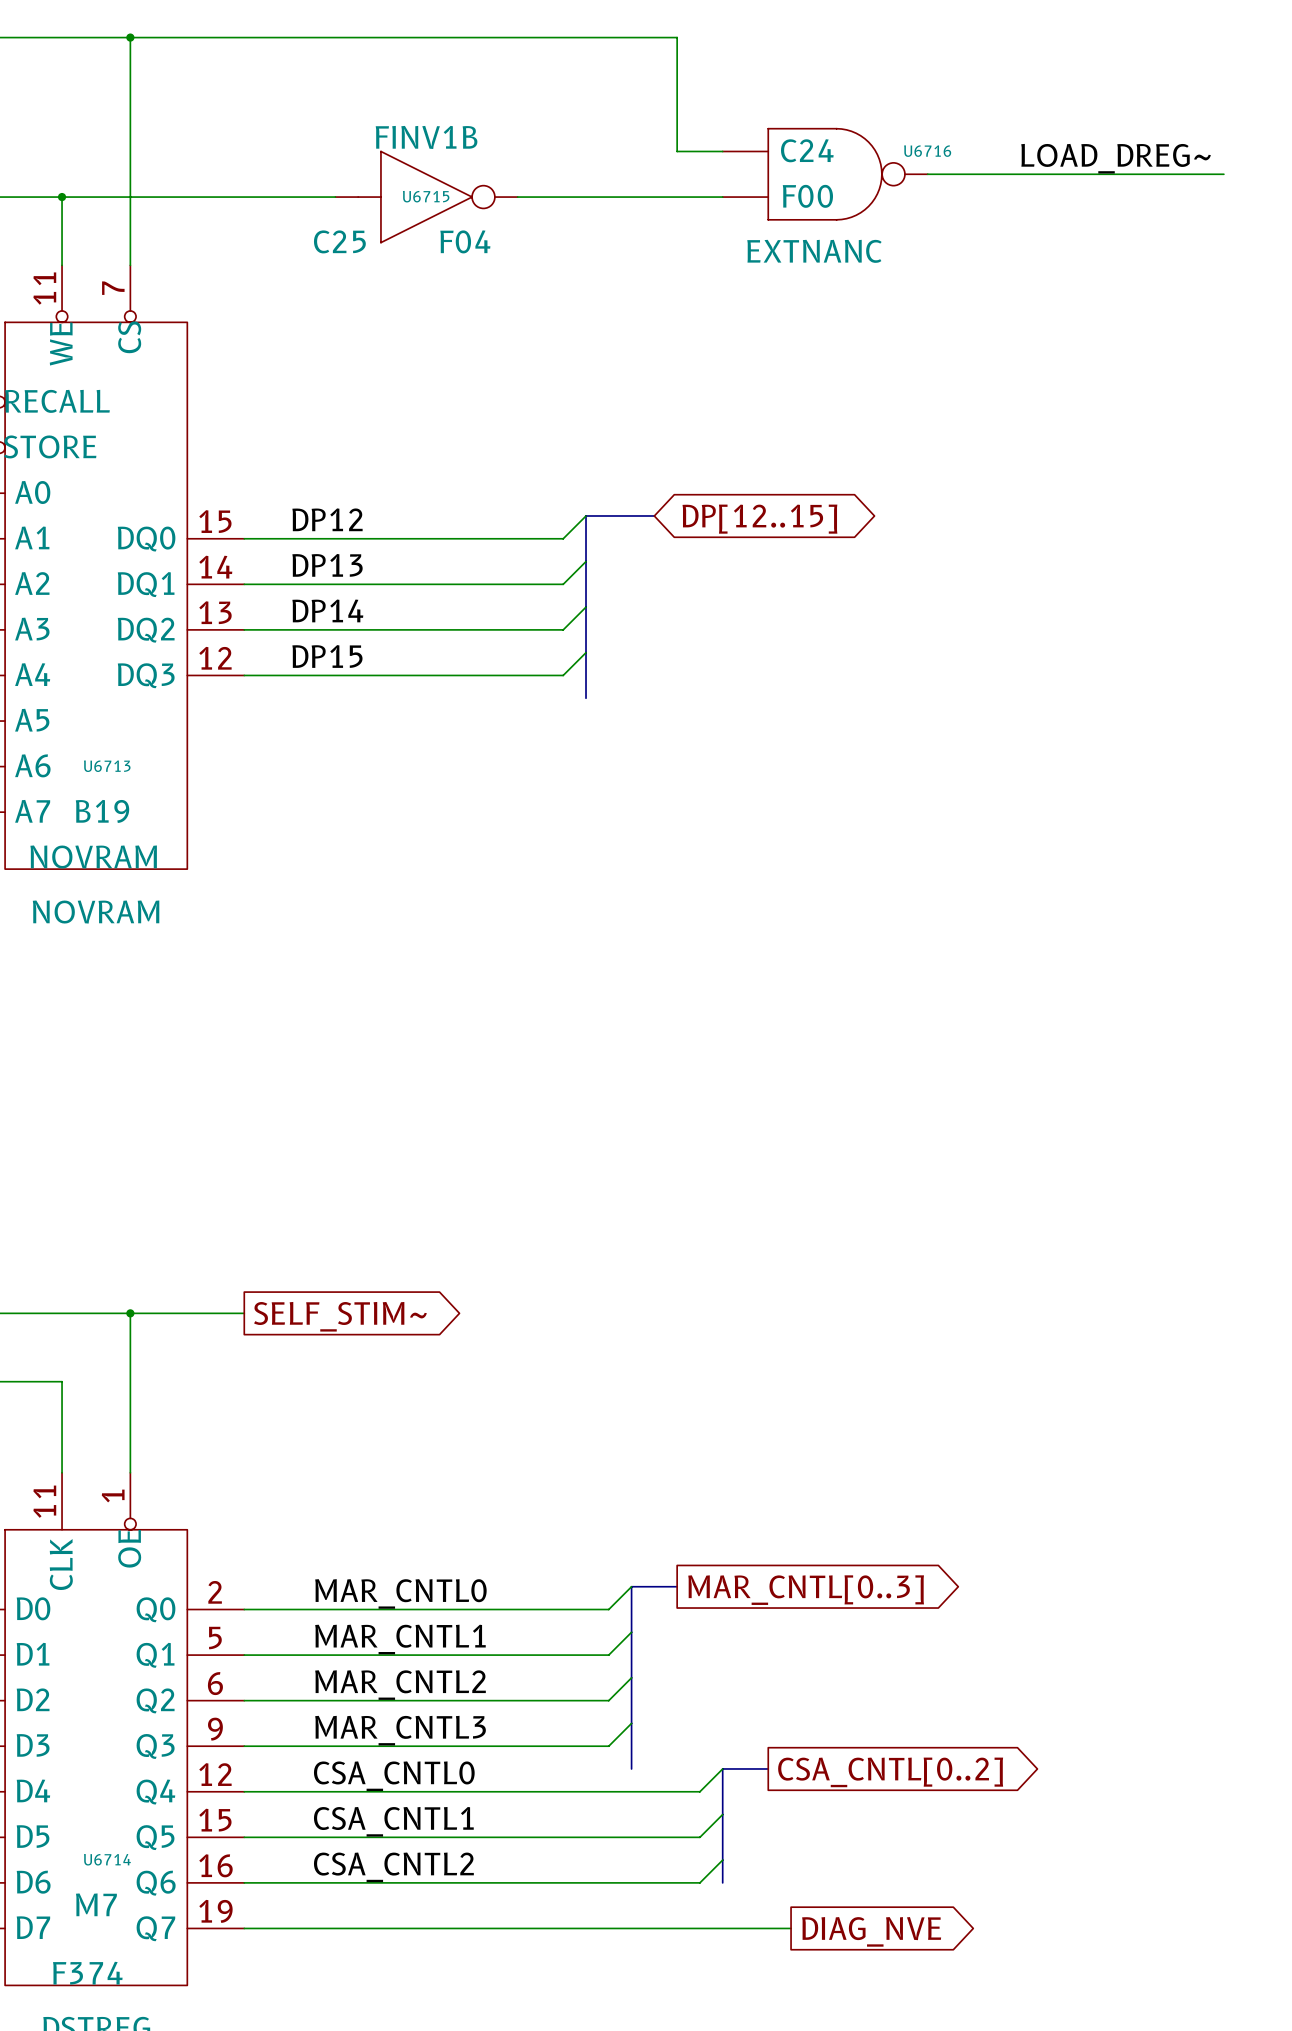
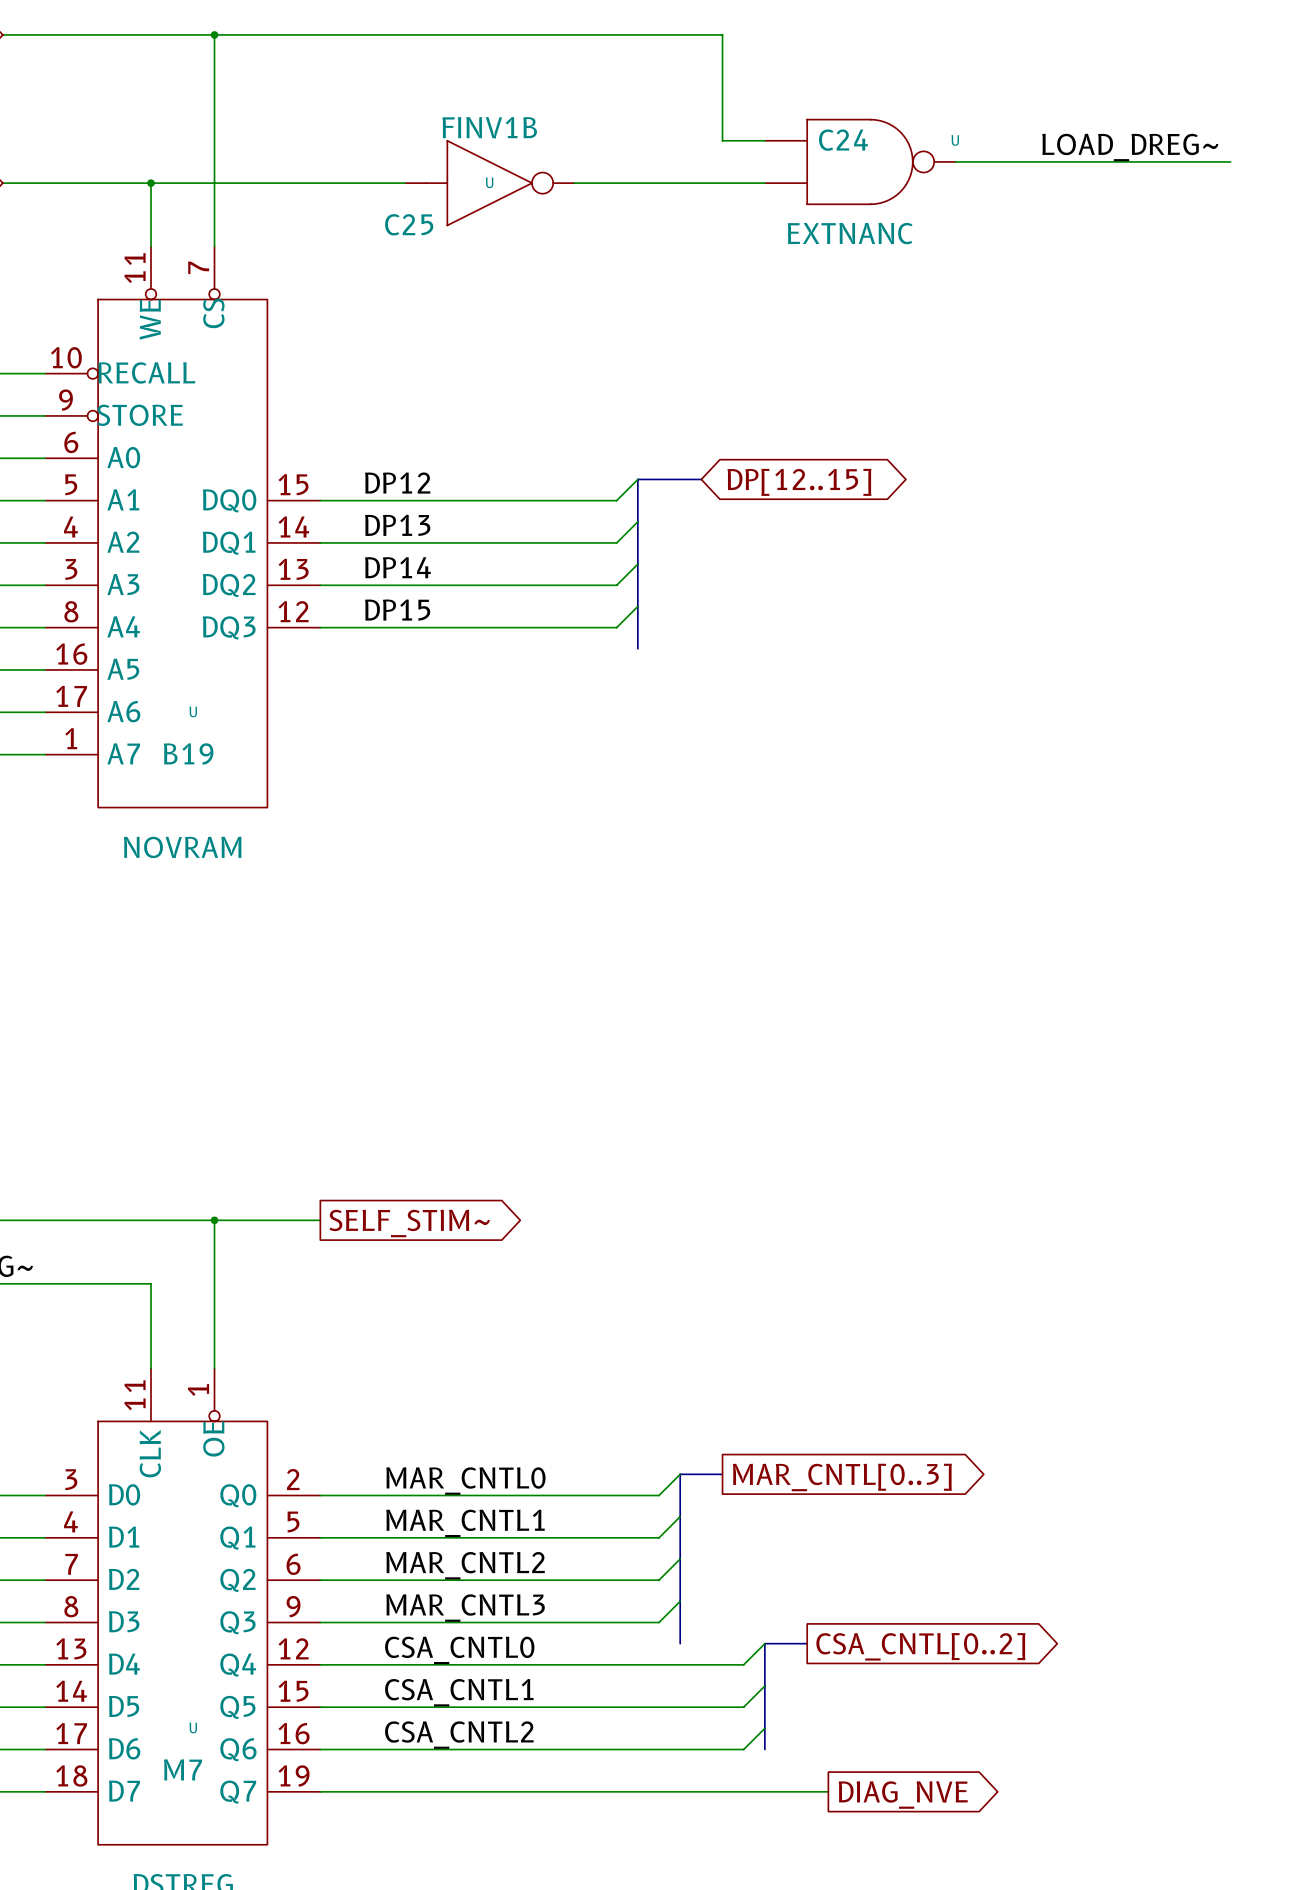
U6716 name: U6716 (927, 151) -> U (955, 140)
U6715 name: U6715 (426, 196) -> U (489, 182)
U6716 value: F00 (807, 196) -> none
U6715 value: F04 (465, 241) -> none
U6713 name: U6713 (107, 766) -> U (193, 711)
U6713 value: NOVRAM (93, 857) -> none
U6714 name: U6714 (107, 1859) -> U (193, 1728)
U6714 value: F374 (87, 1973) -> none

